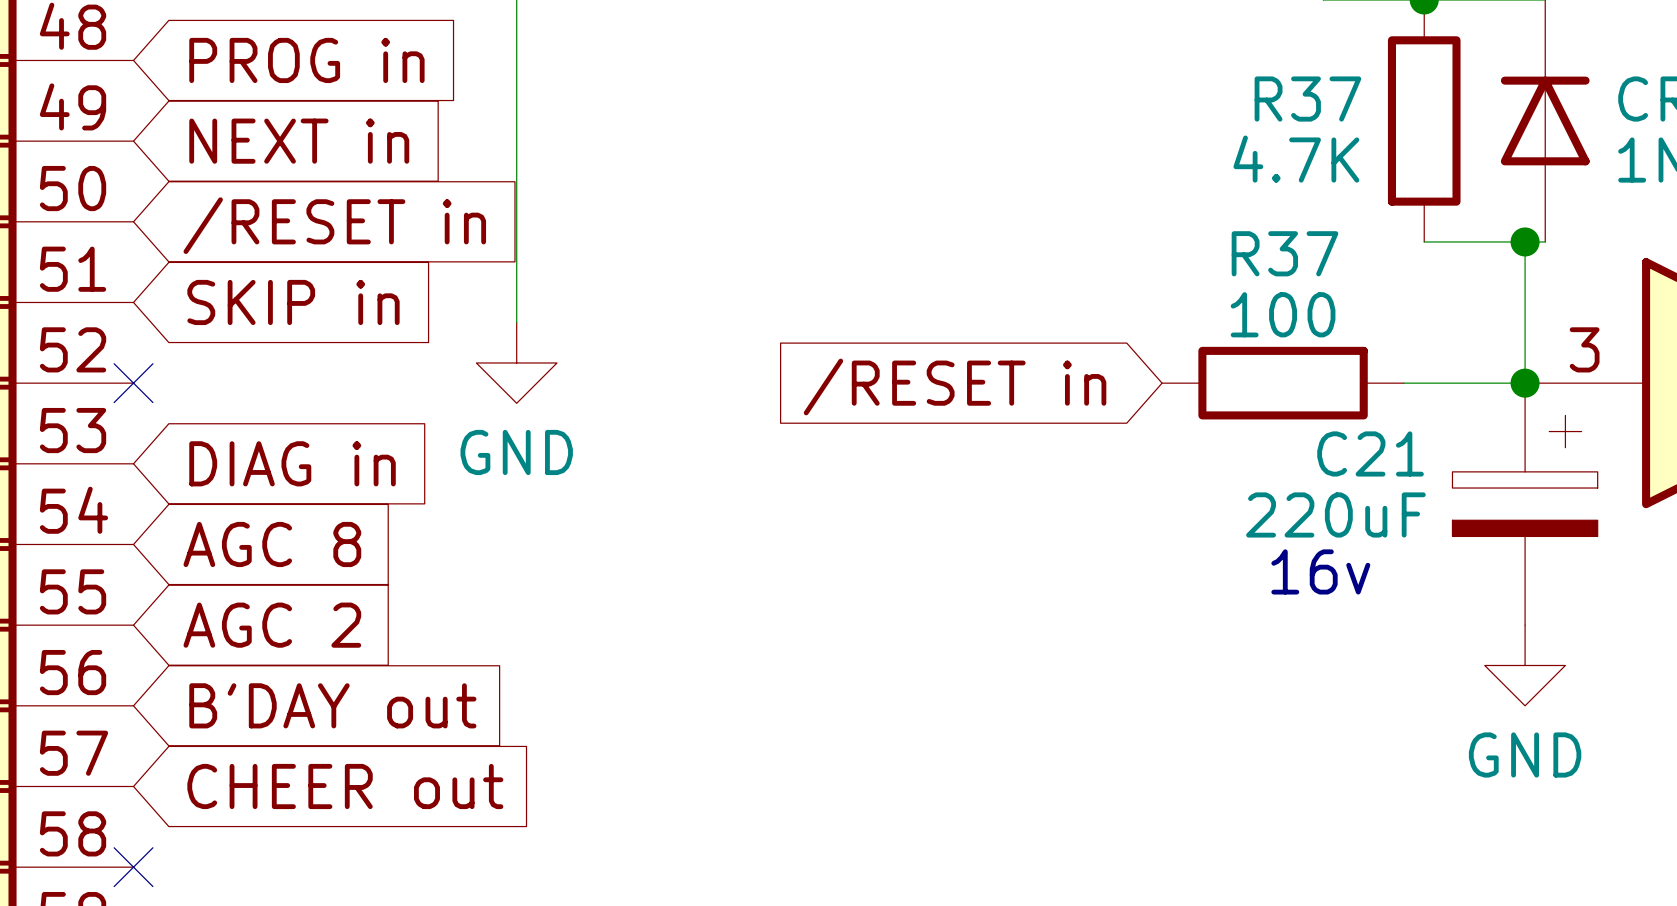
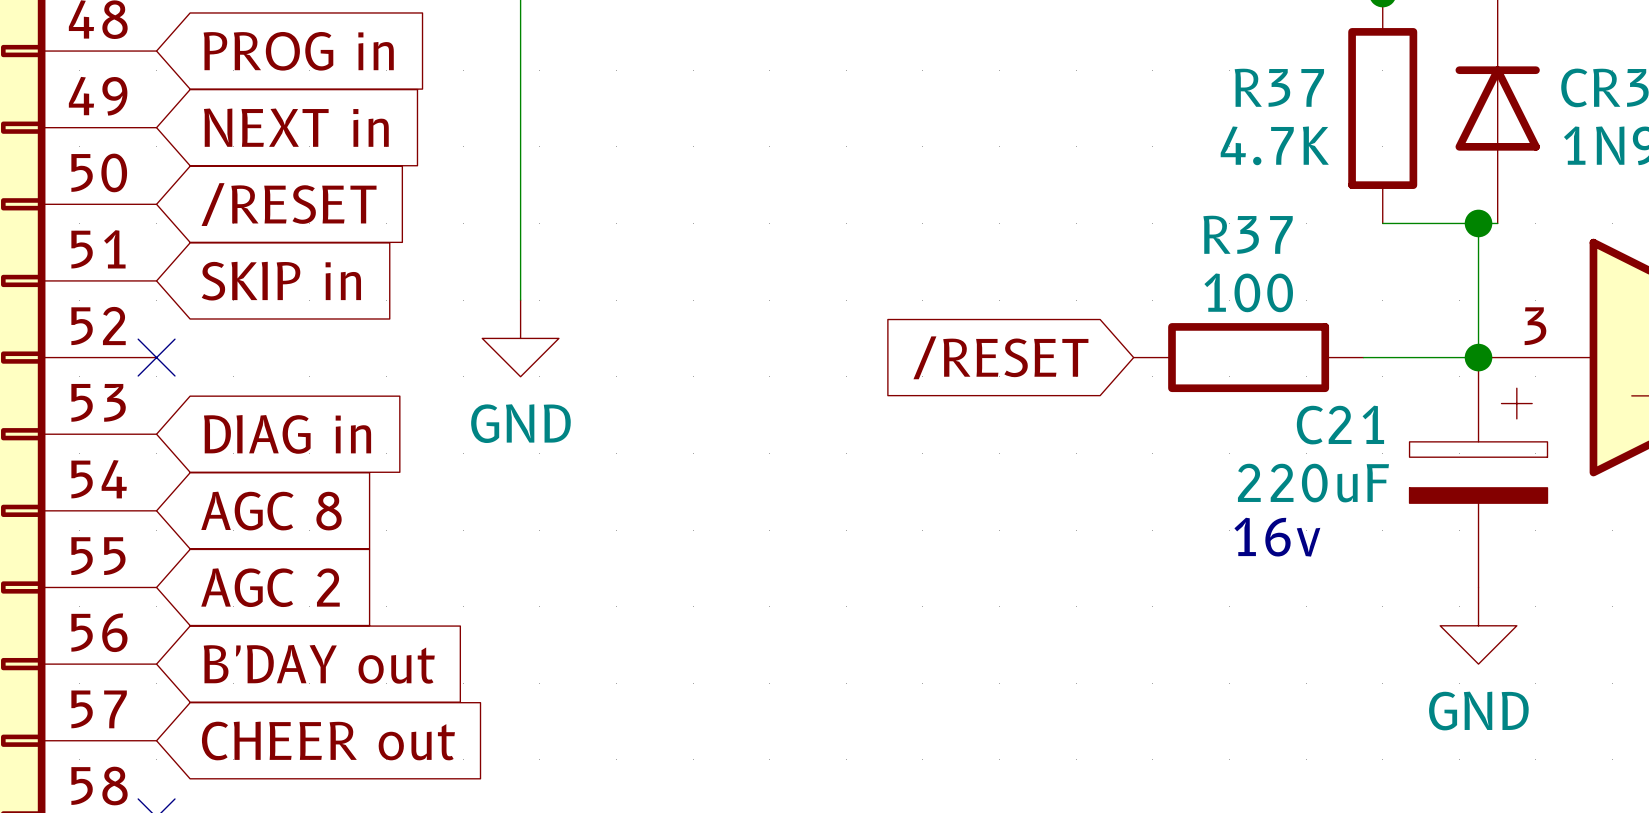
global label: /RESET in (334, 225) -> /RESET (289, 204)
global label: /RESET in (955, 386) -> /RESET (1000, 357)

